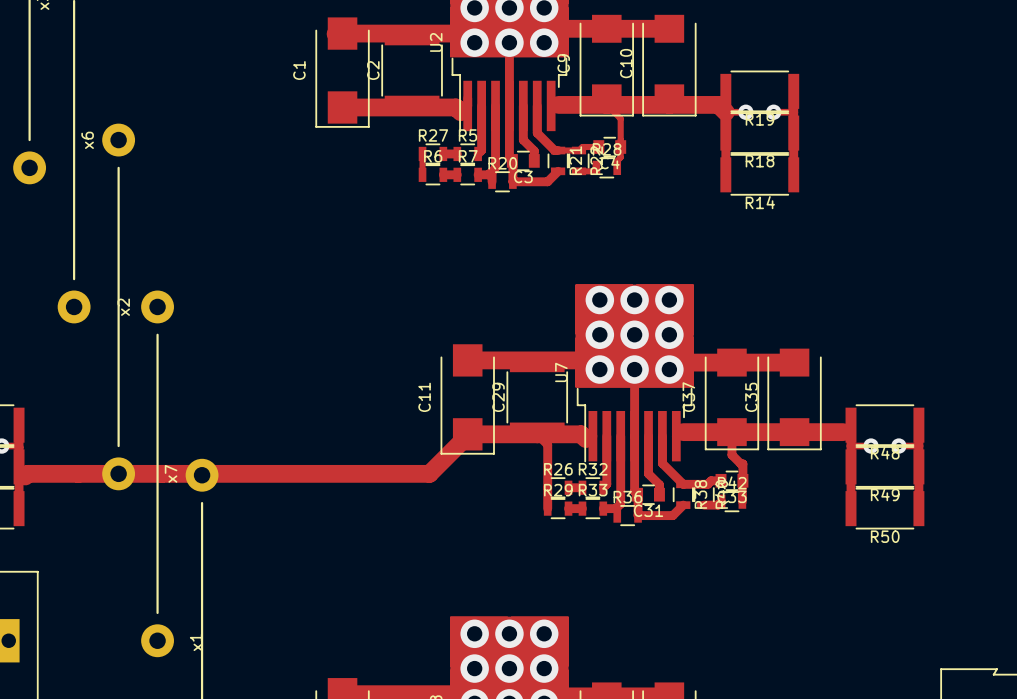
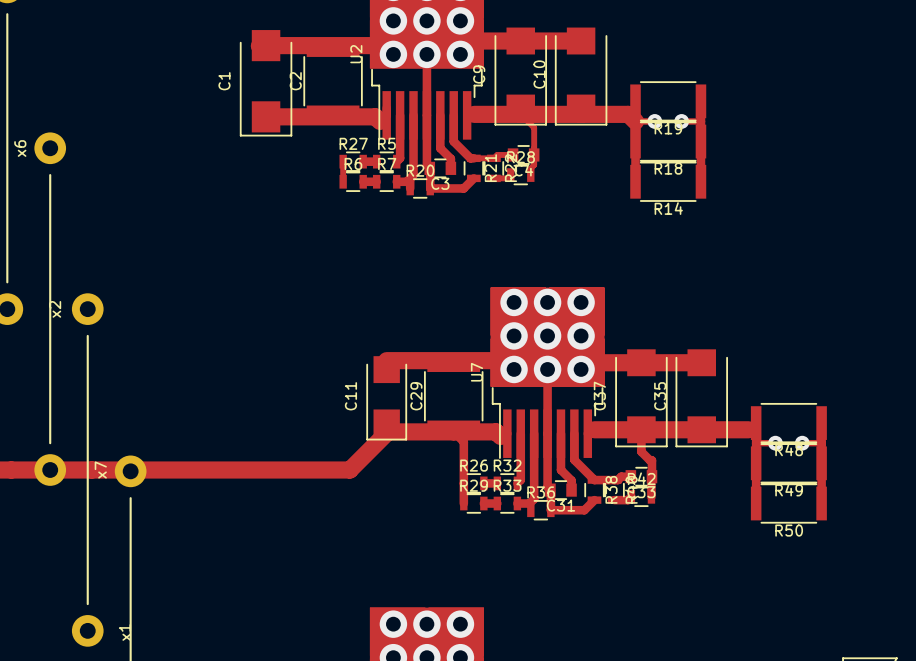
C11 footprint: [440, 344, 495, 455] -> [366, 356, 407, 441]

